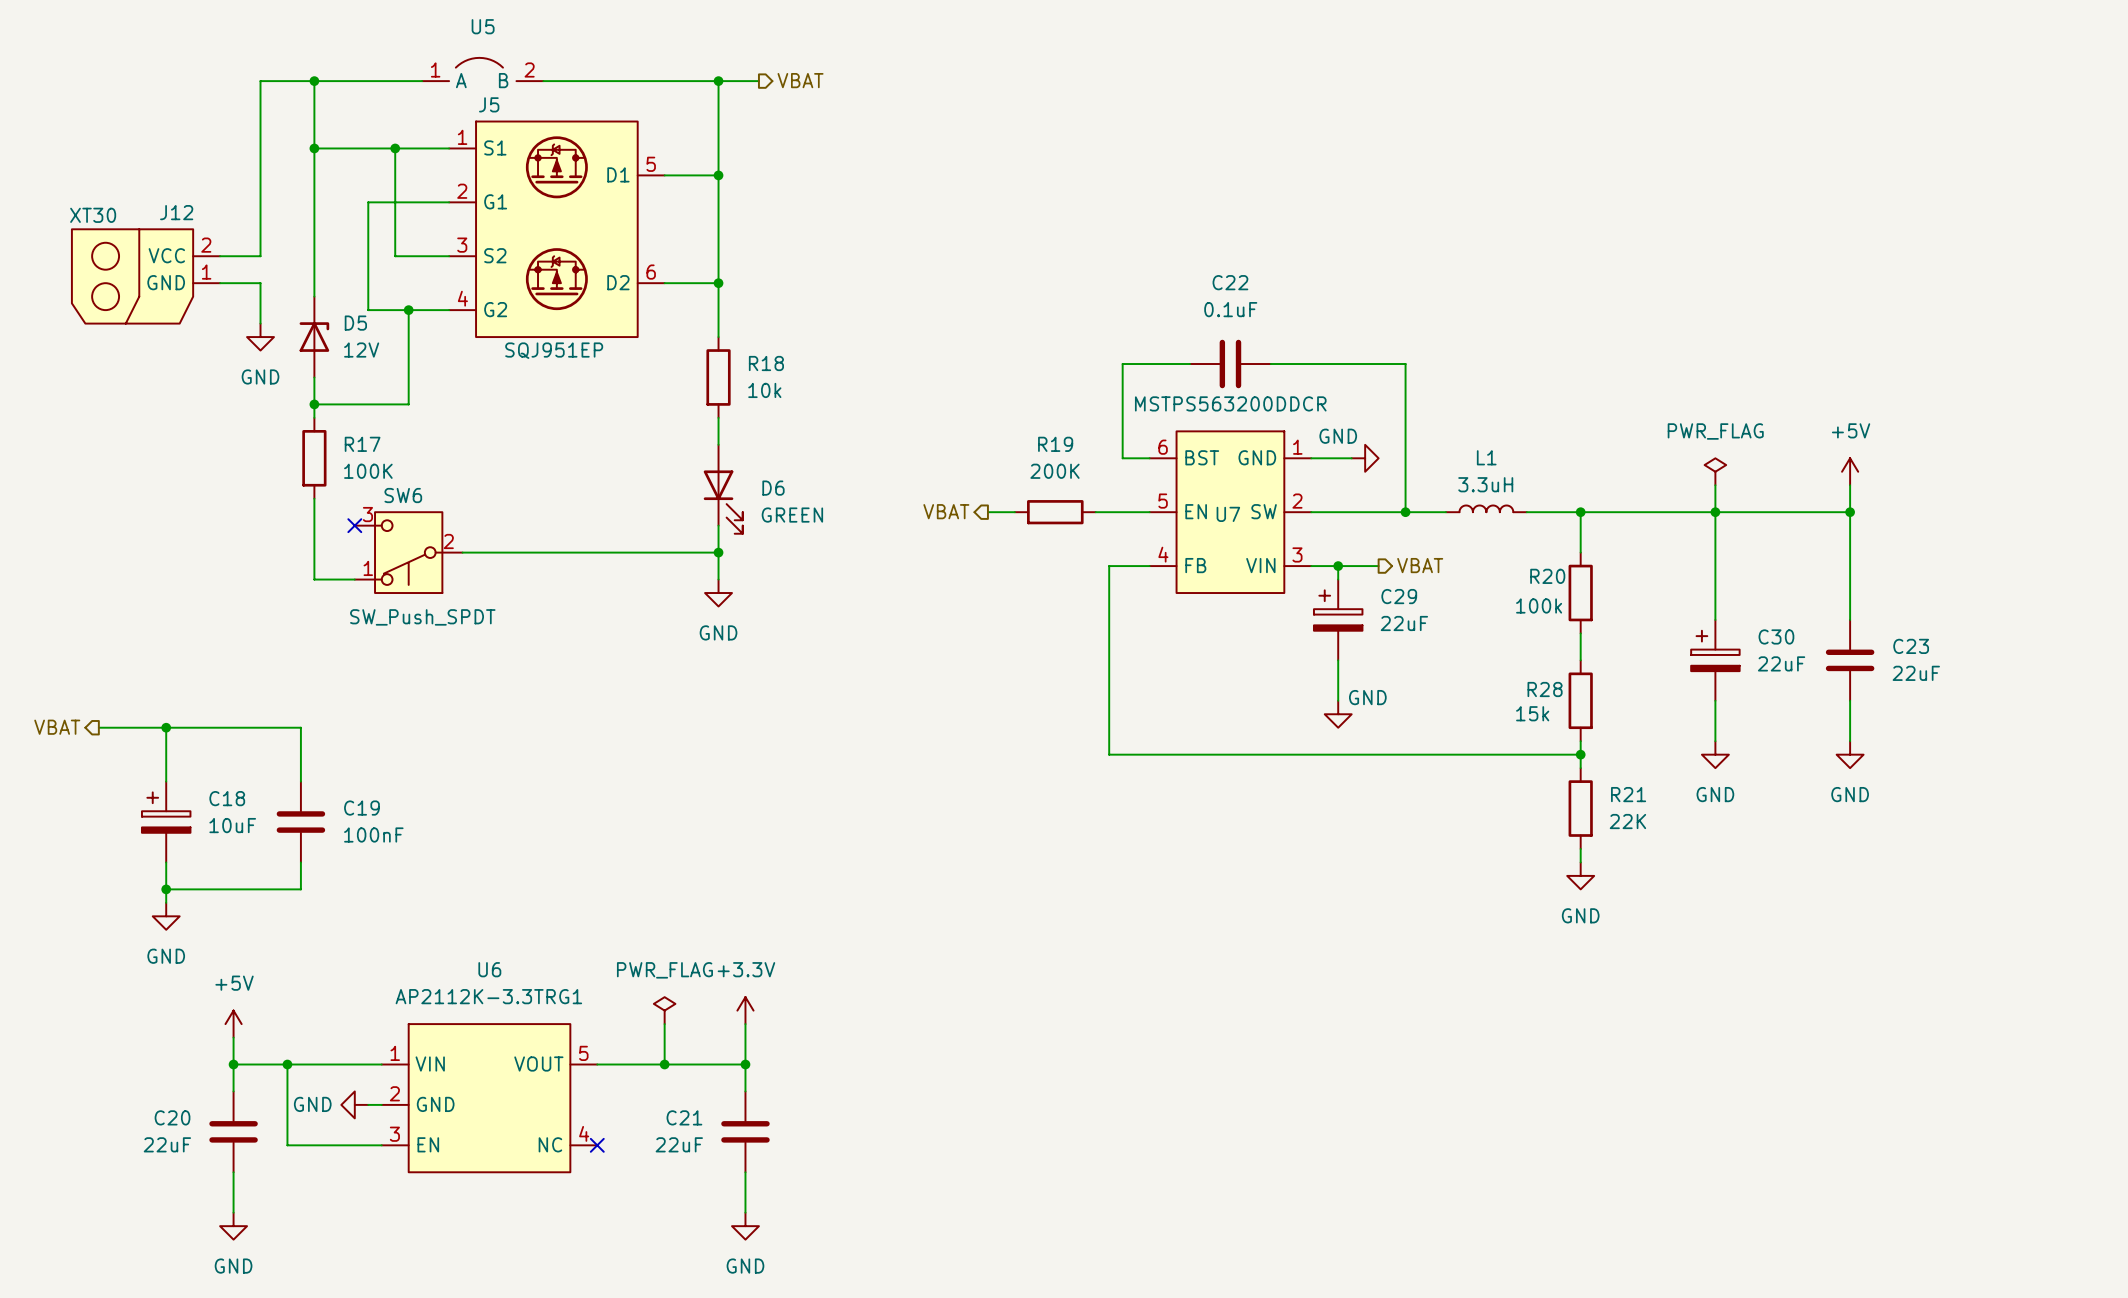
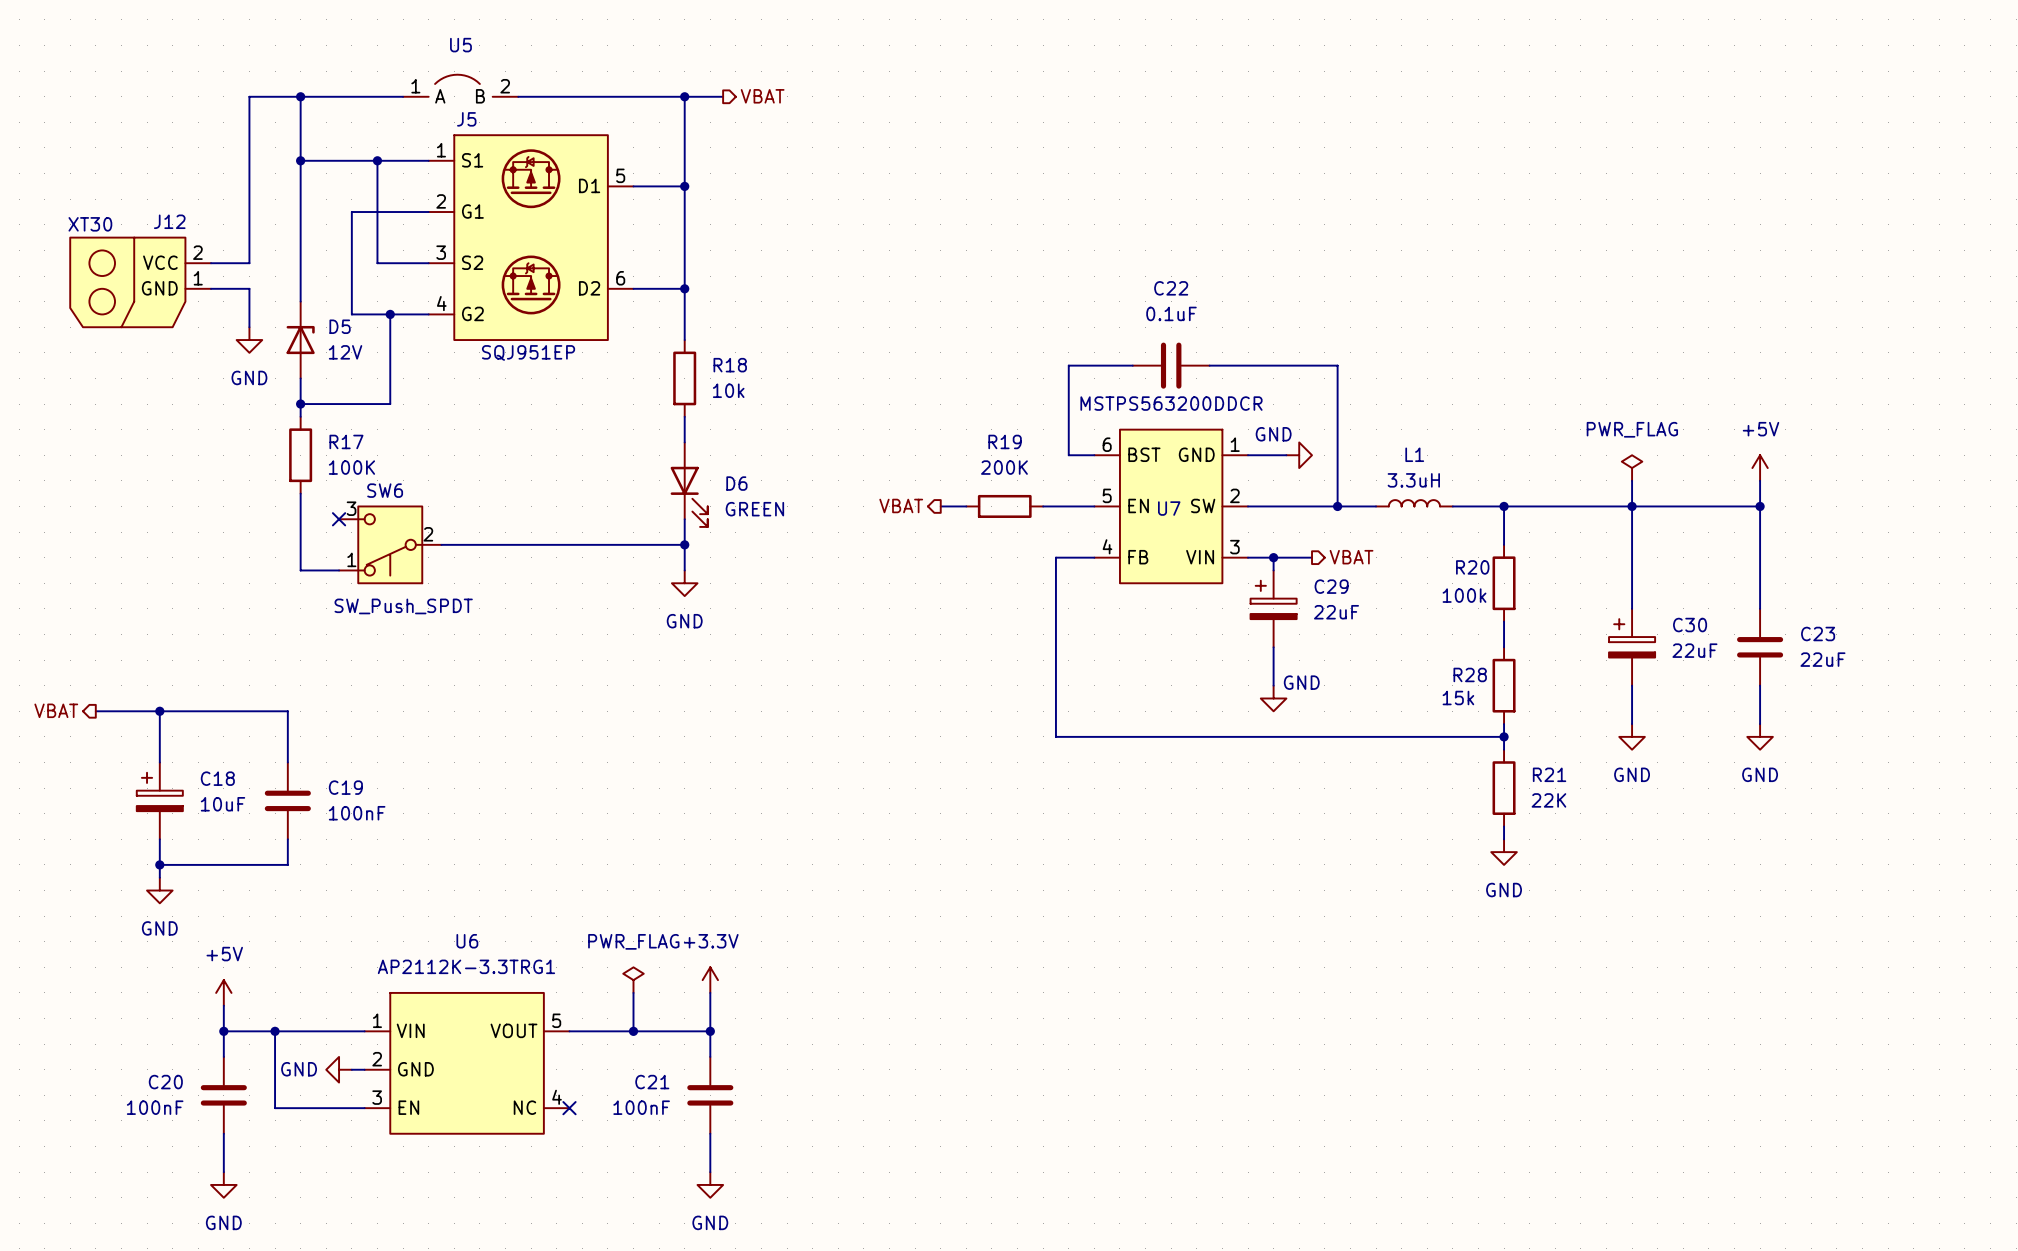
C20 value: 22uF (167, 1144) -> 100nF (155, 1107)
C21 value: 22uF (679, 1144) -> 100nF (641, 1107)

